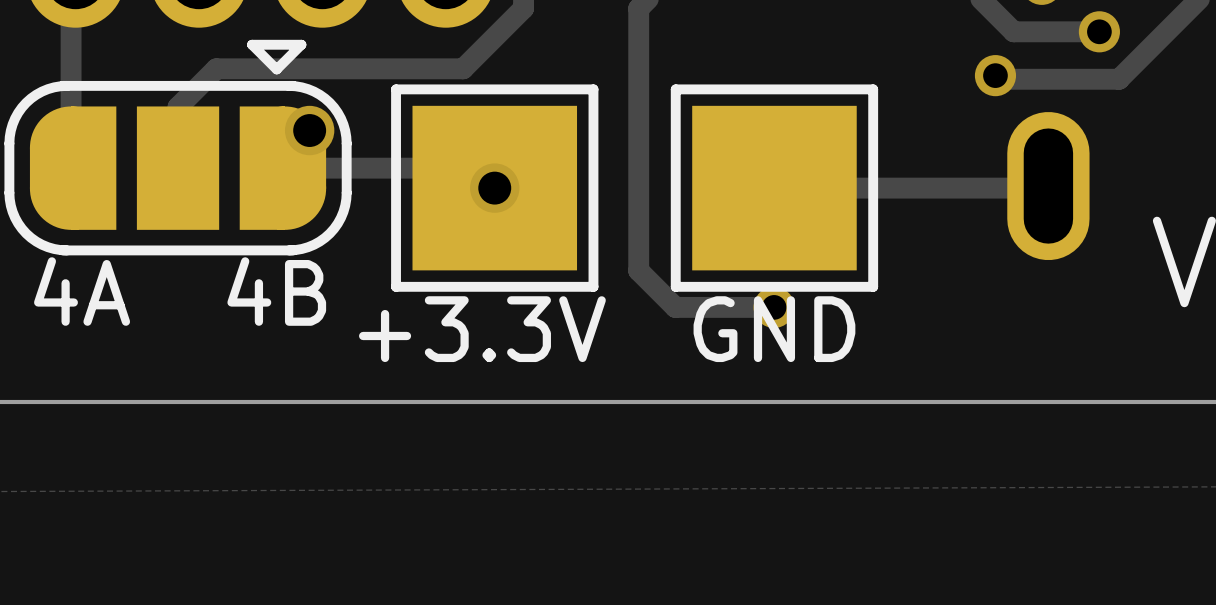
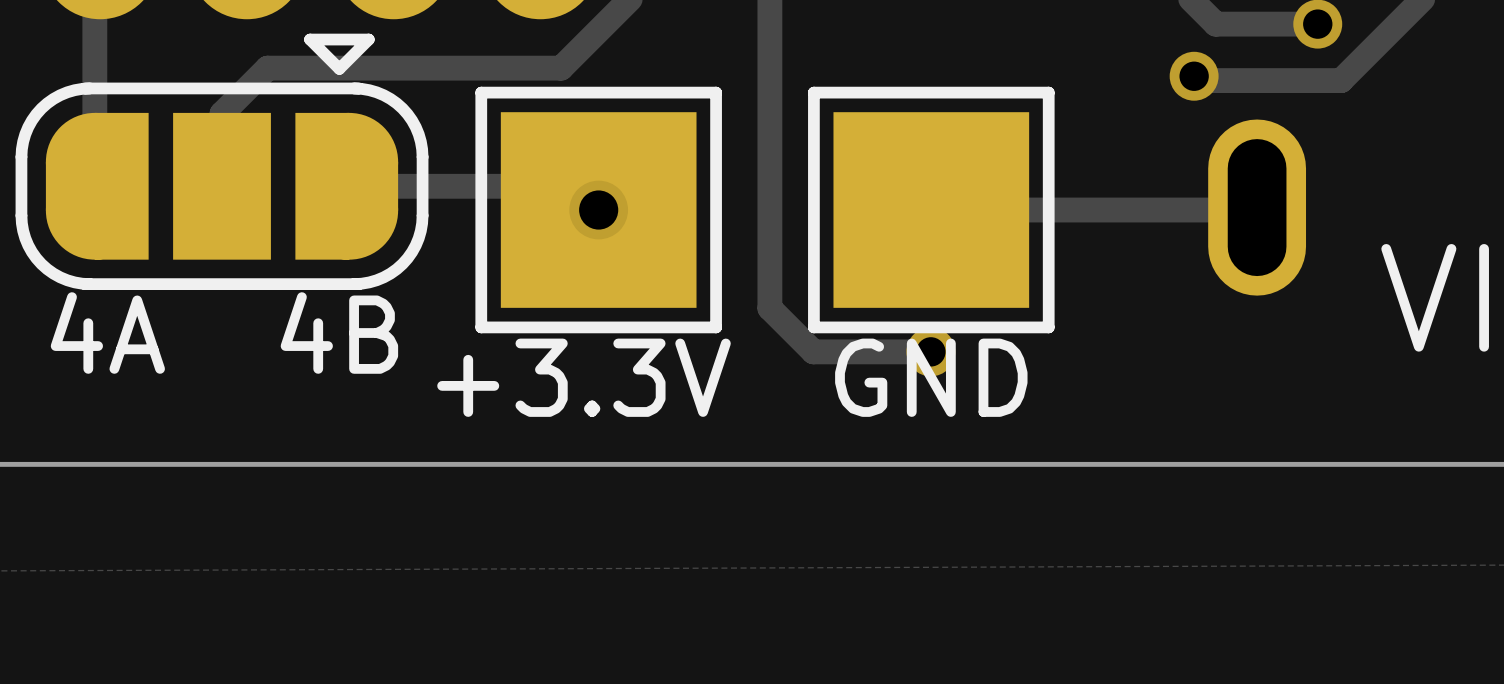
via: (309, 130) -> none

